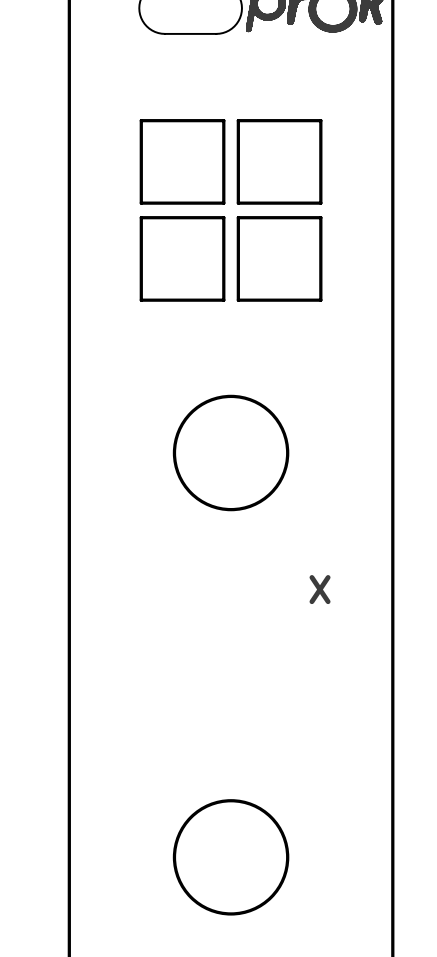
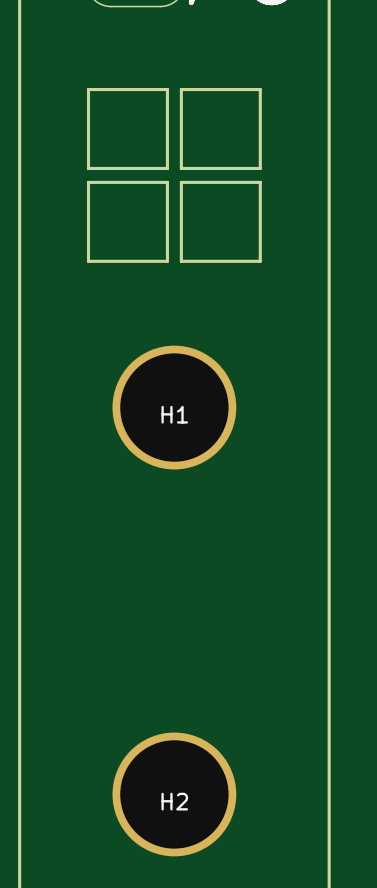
round board edge: [172, 394, 290, 512] -> none
H1: none -> (174, 407)
text: X (320, 589) -> none
round board edge: [172, 799, 290, 916] -> none
H2: none -> (174, 794)

